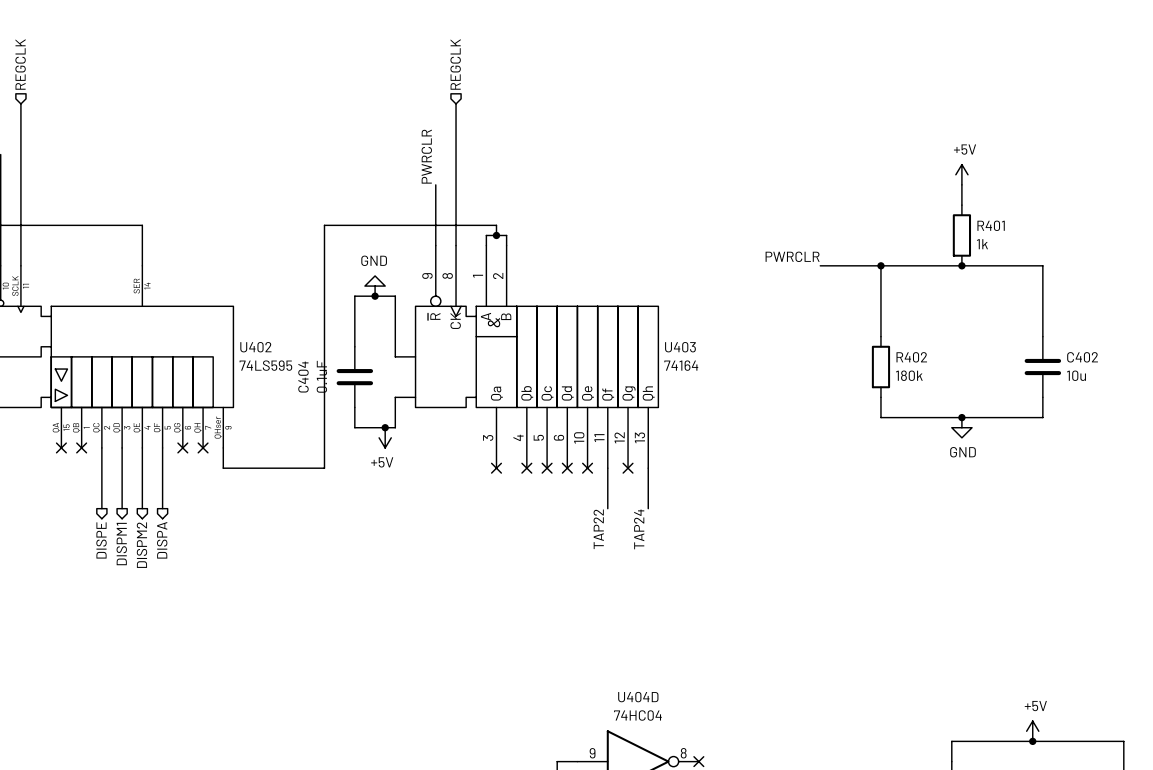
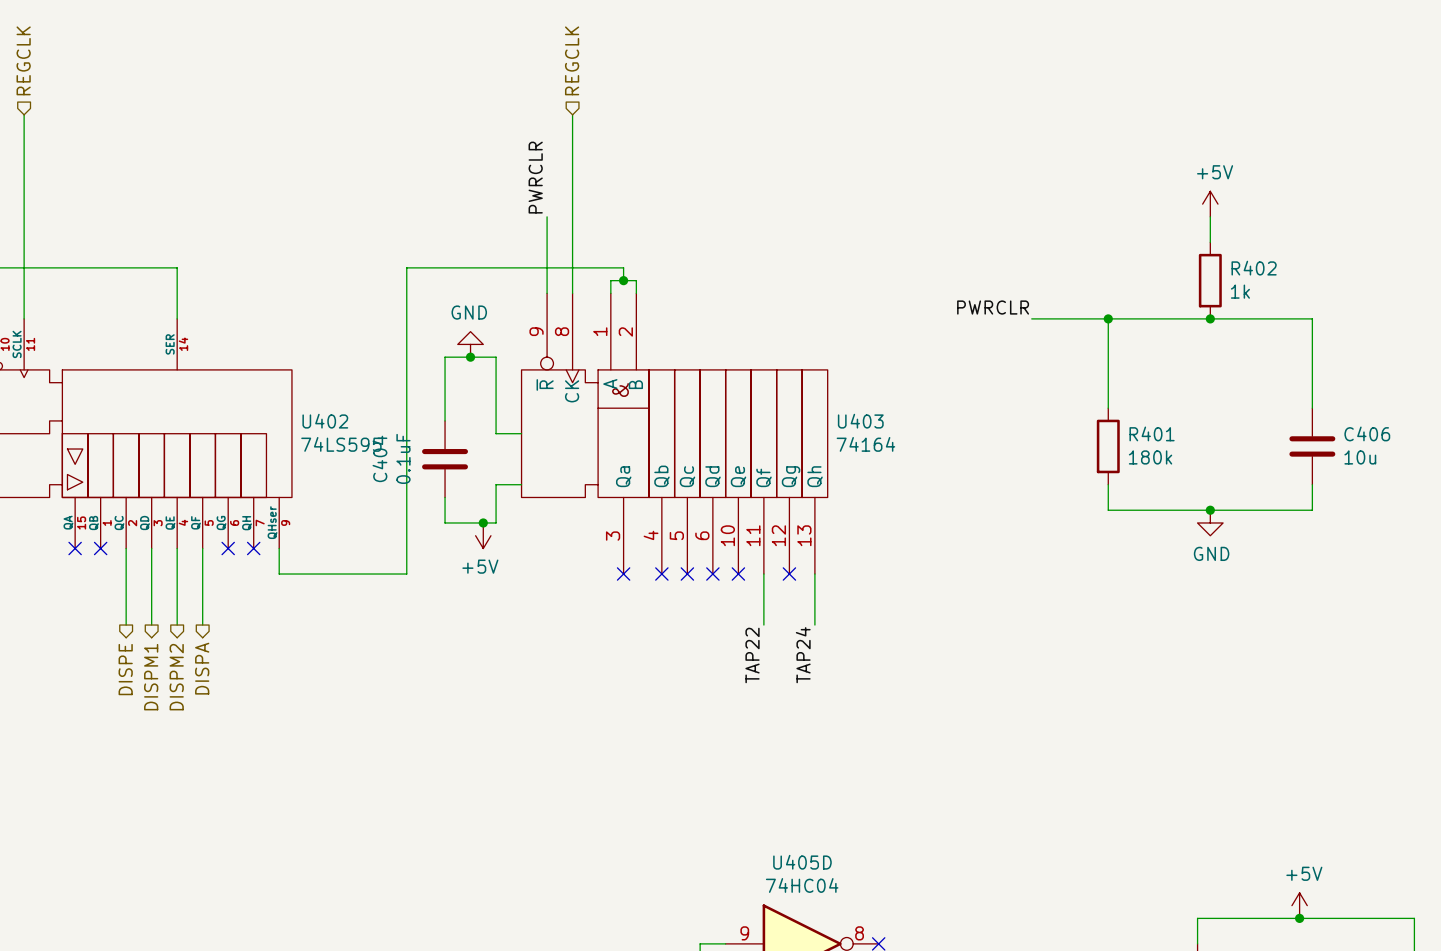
R401 name: R401 (991, 225) -> R402 (1254, 268)
R402 name: R402 (911, 357) -> R401 (1152, 433)
C402 name: C402 (1082, 357) -> C406 (1367, 433)
U404D name: U404D (638, 697) -> U405D (802, 862)

